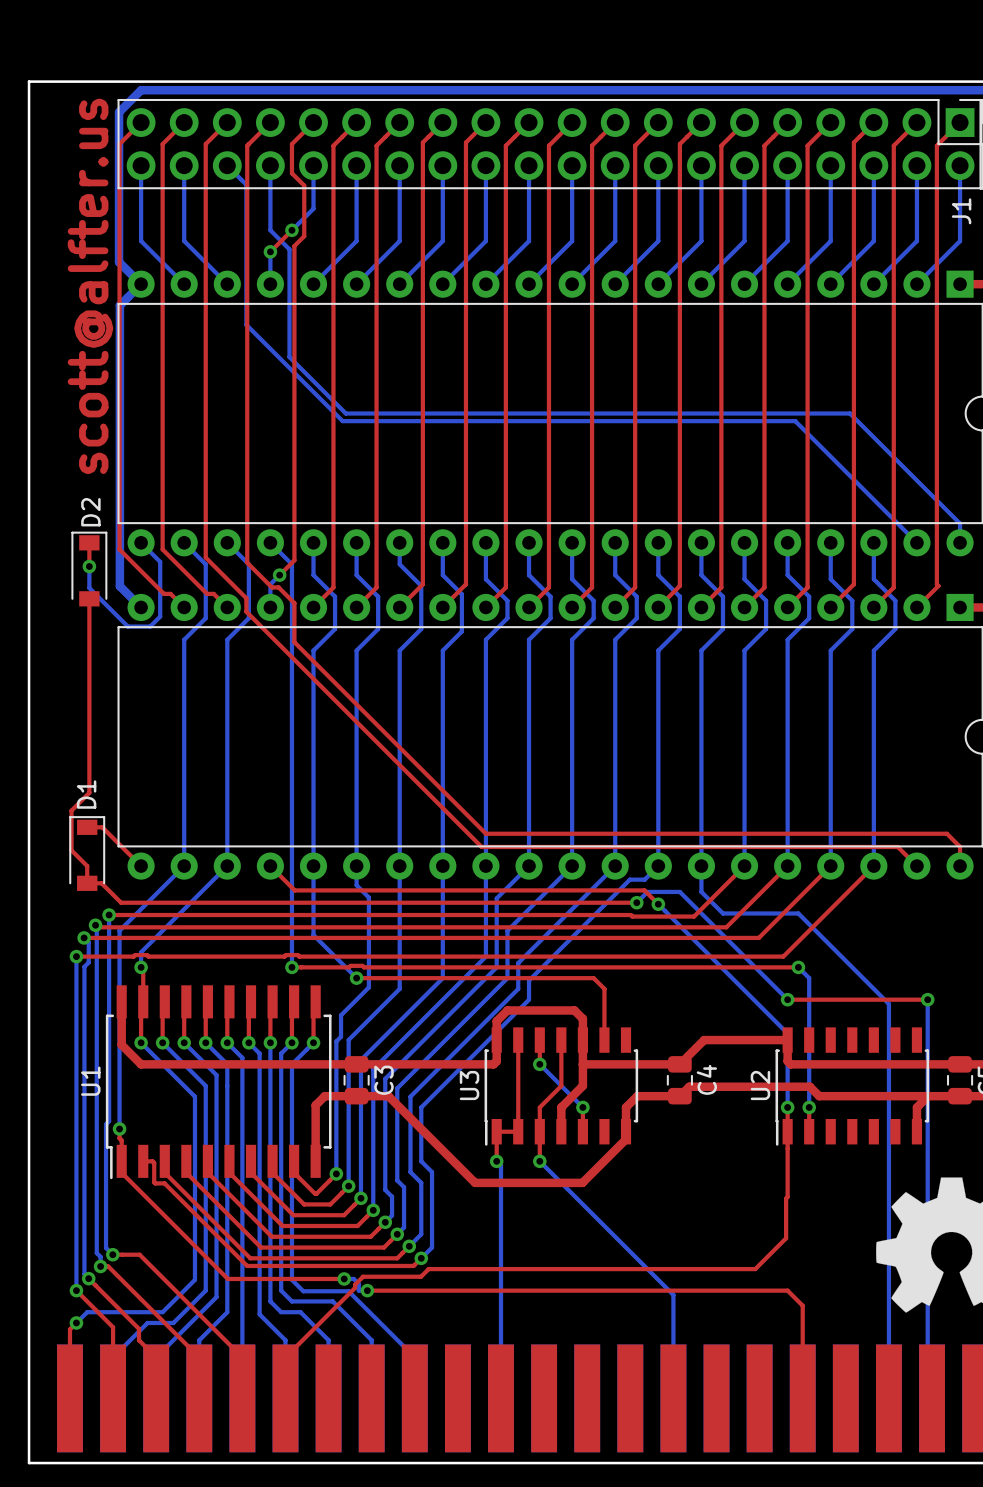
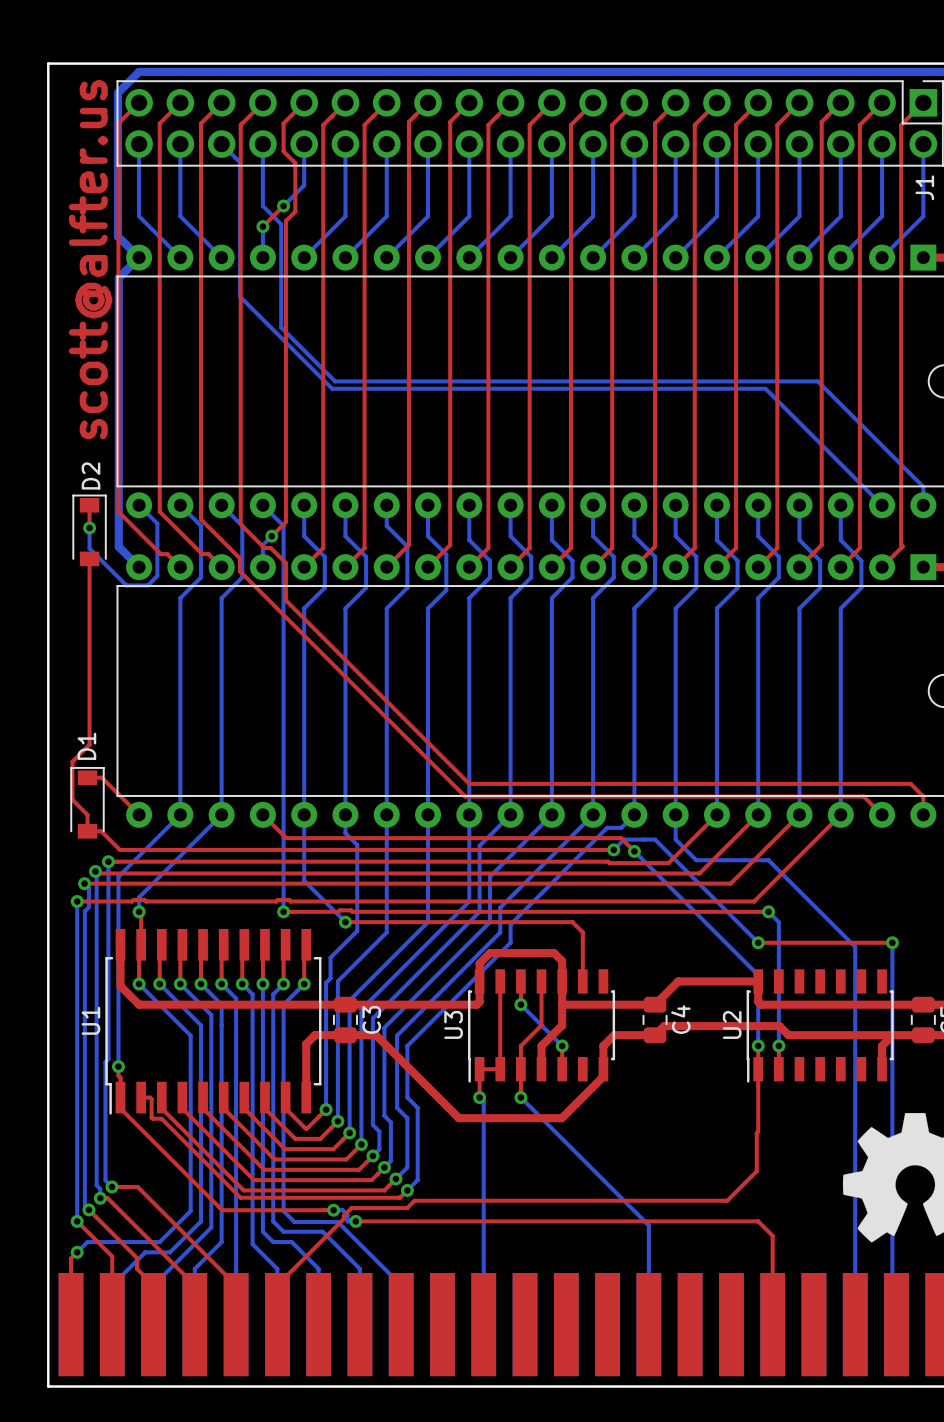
board edge: (46, 81) (29, 81) (29, 1463) (46, 1463) -> (48, 63) (48, 1386)

